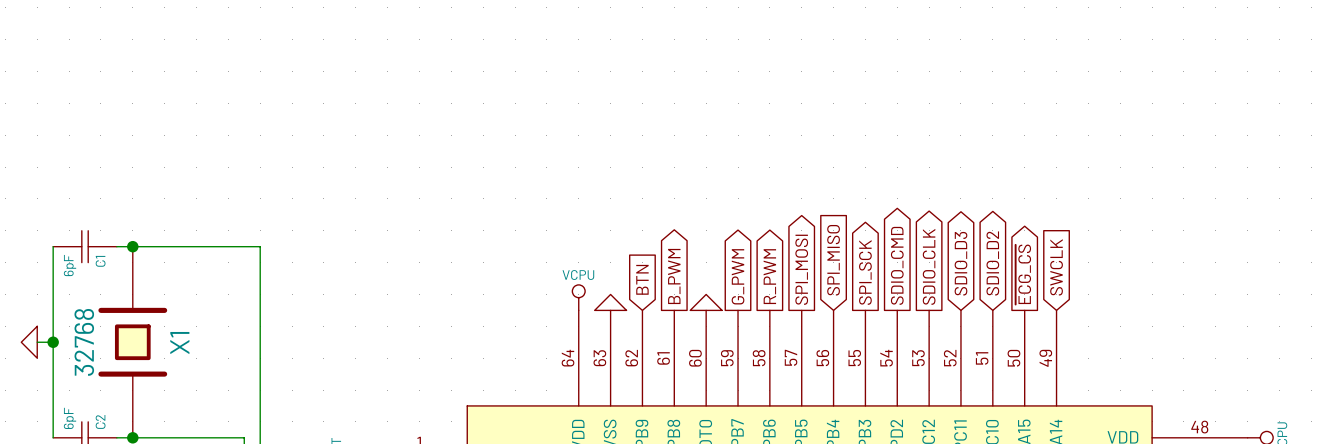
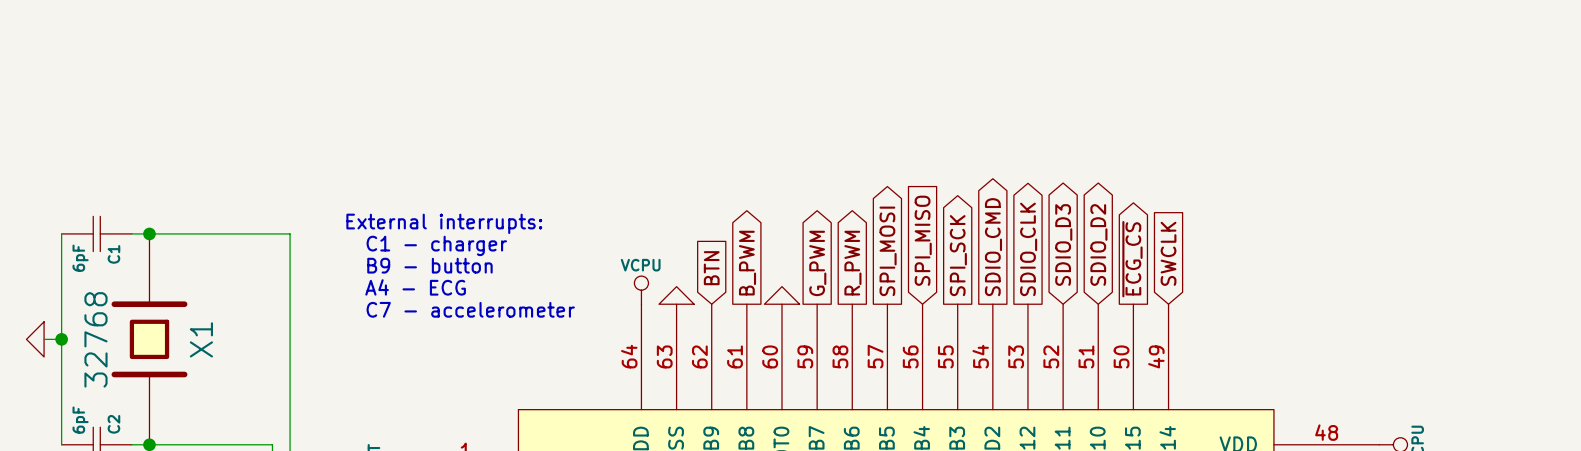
text: none -> External interrupts: (444, 223)
text: none -> C1 - charger (436, 245)
text: none -> B9 - button (429, 265)
text: none -> A4 - ECG (415, 287)
text: none -> C7 - accelerometer (470, 309)

